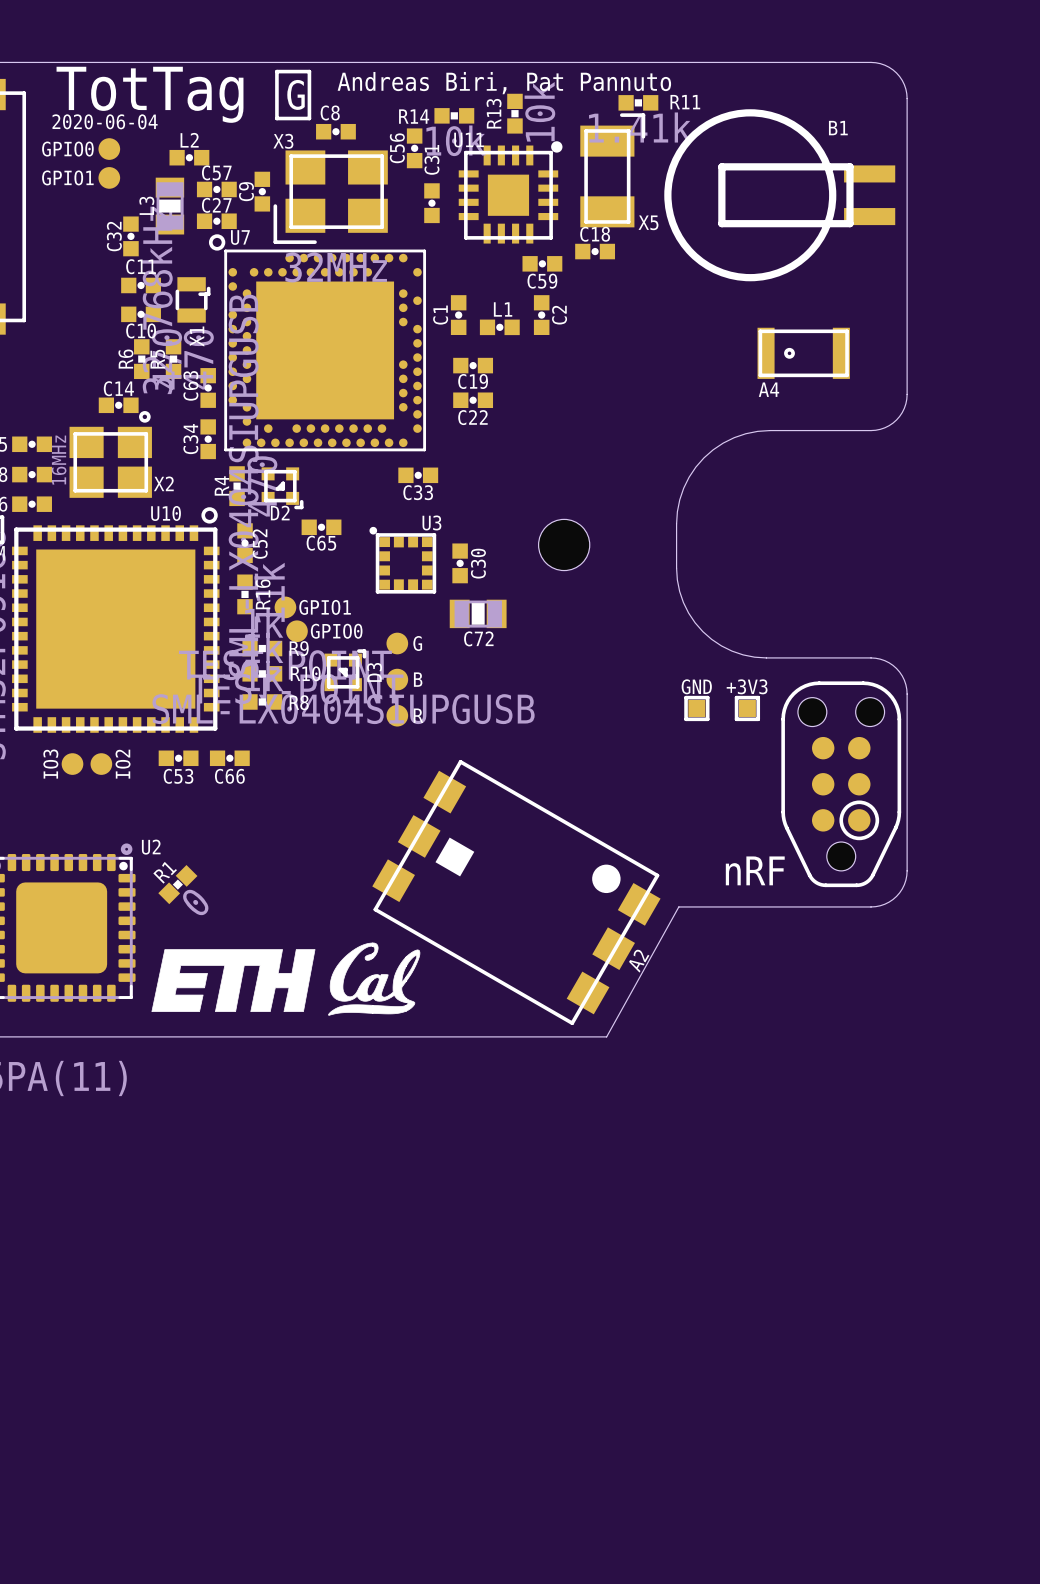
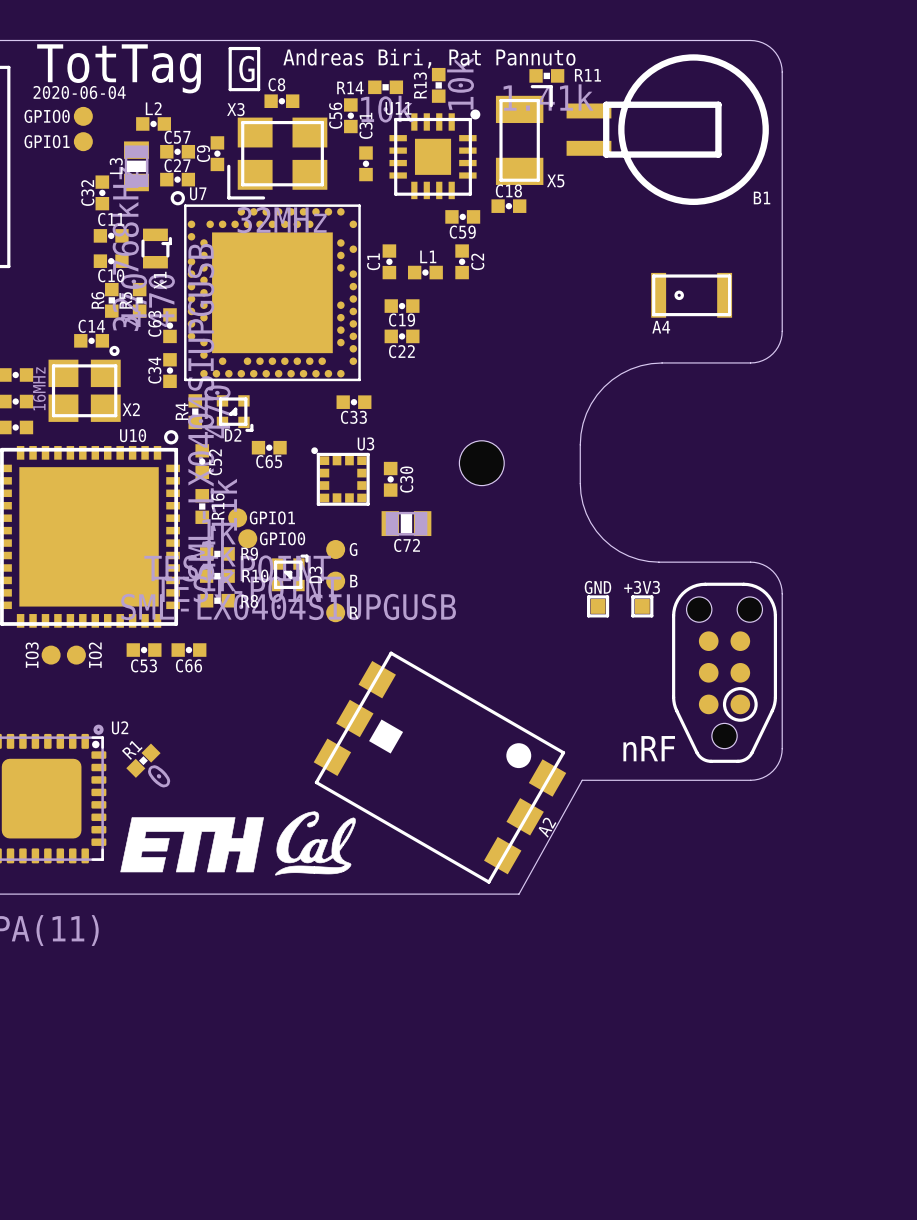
B1 name position: B1 (838, 128) -> B1 (762, 197)
B1 rotation: 0° (779, 195) -> 180° (667, 129)

